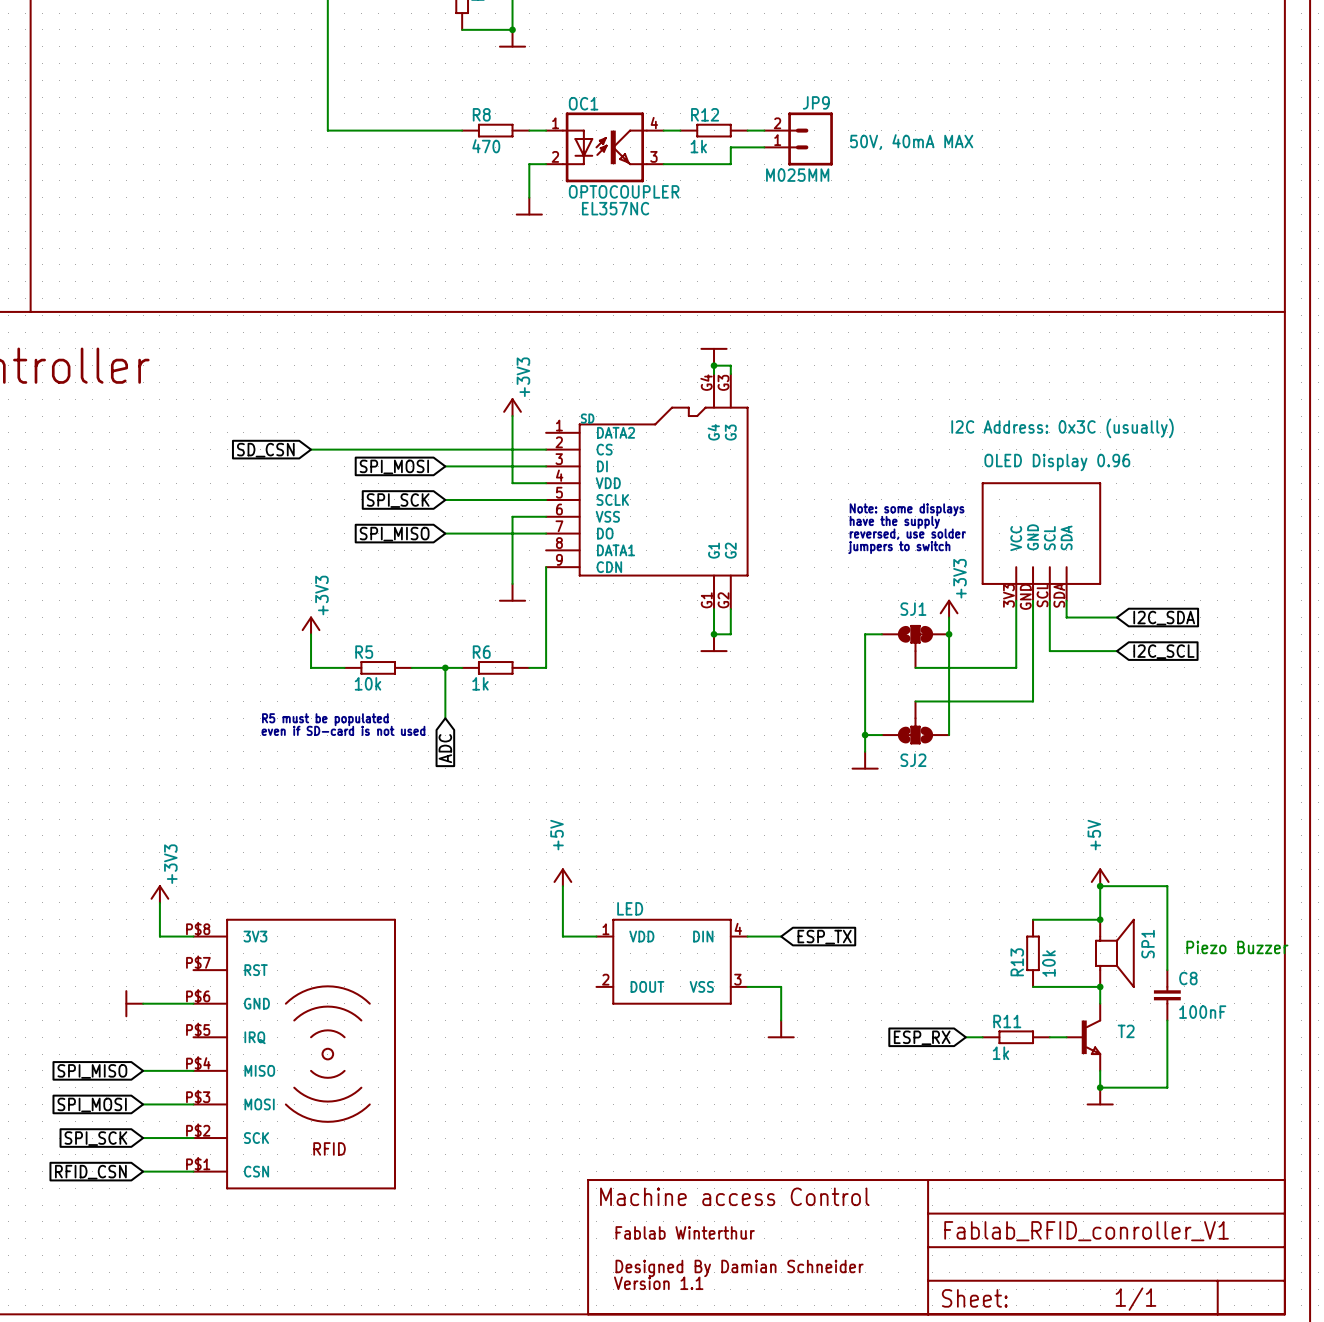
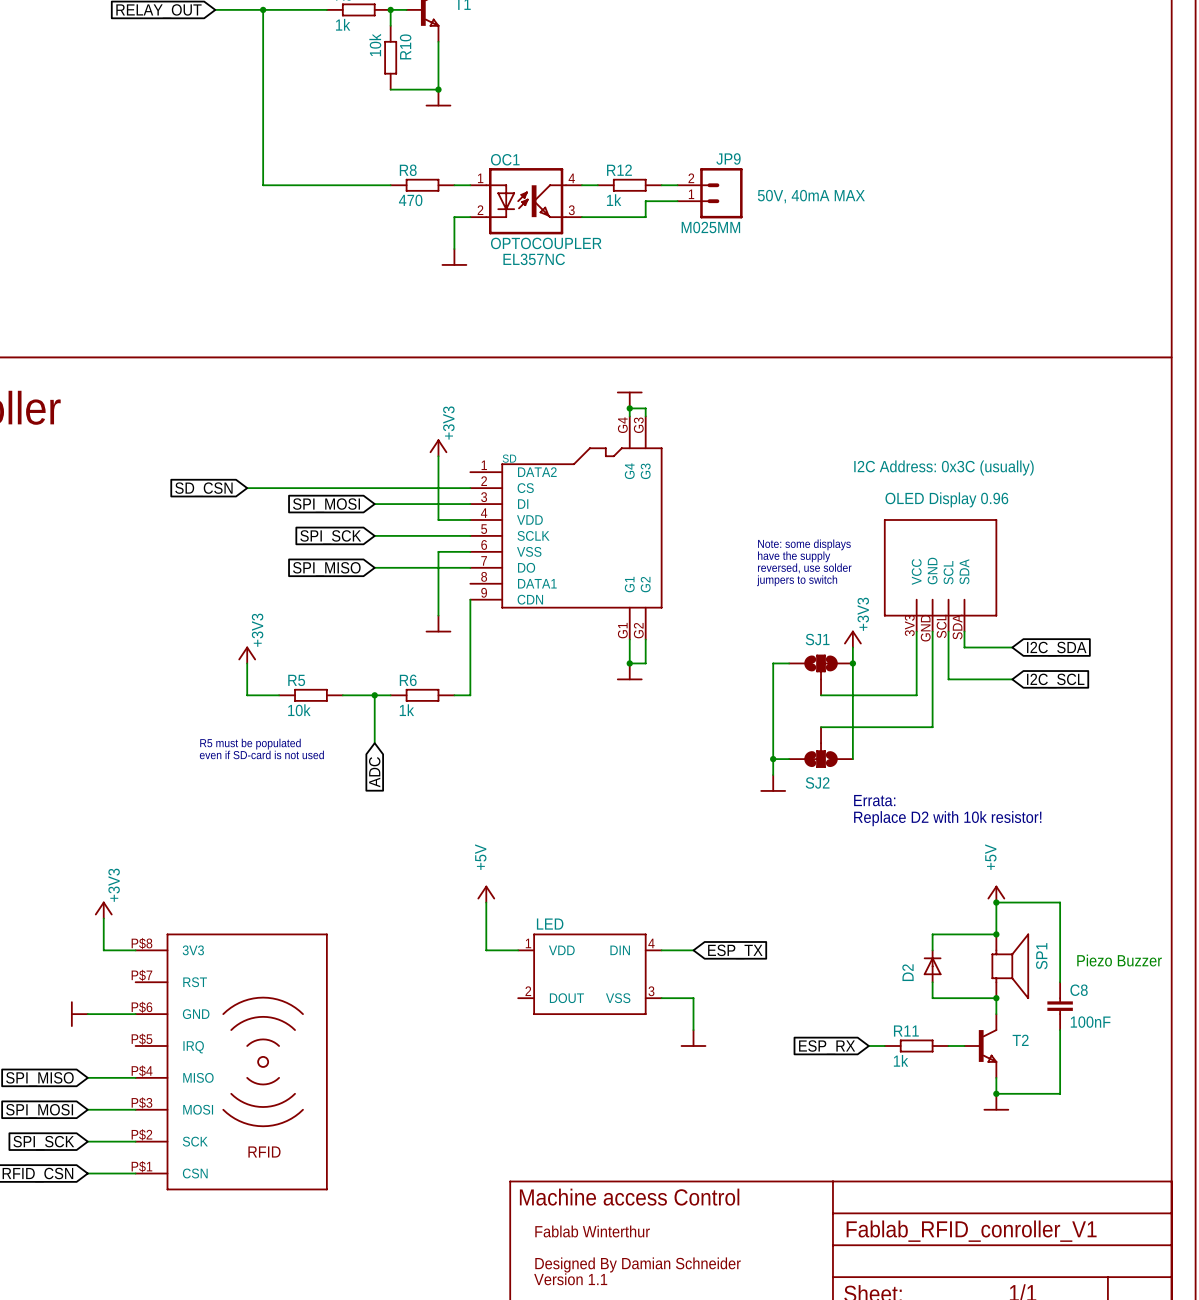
text: none -> Errata: (874, 800)
text: none -> Replace D2 with 10k resistor! (947, 818)
R13: 10k (1033, 953) -> none
D2: none -> (932, 966)

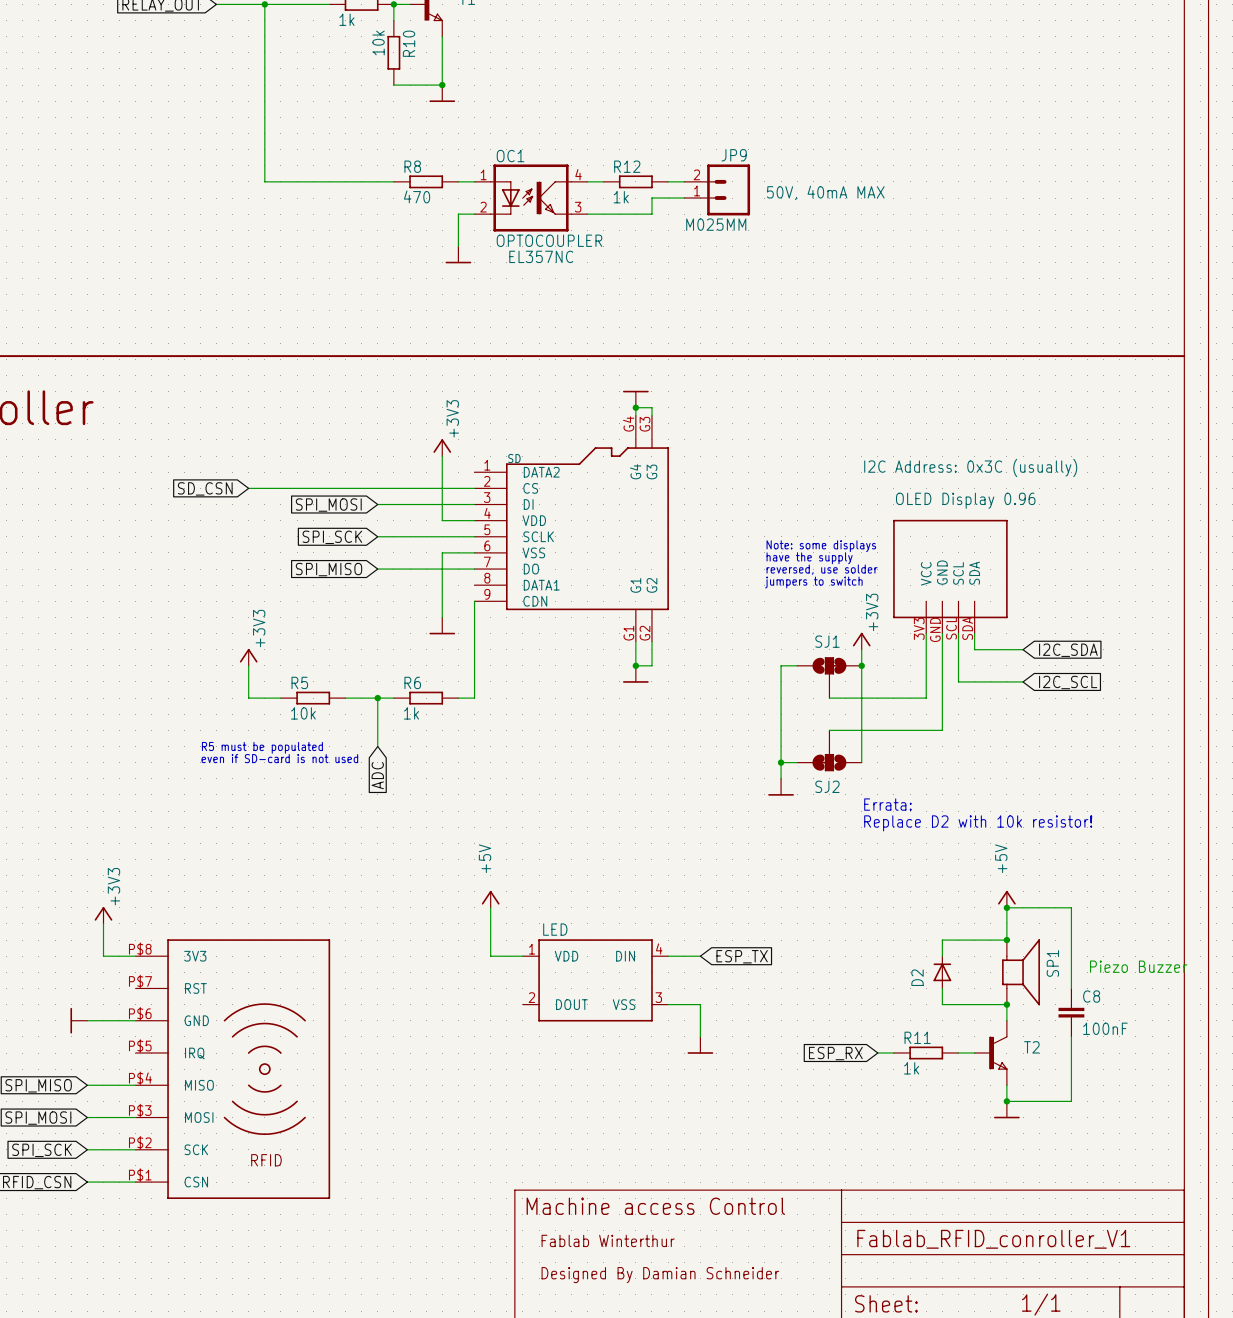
text: Version 1.1 (570, 1279) -> none

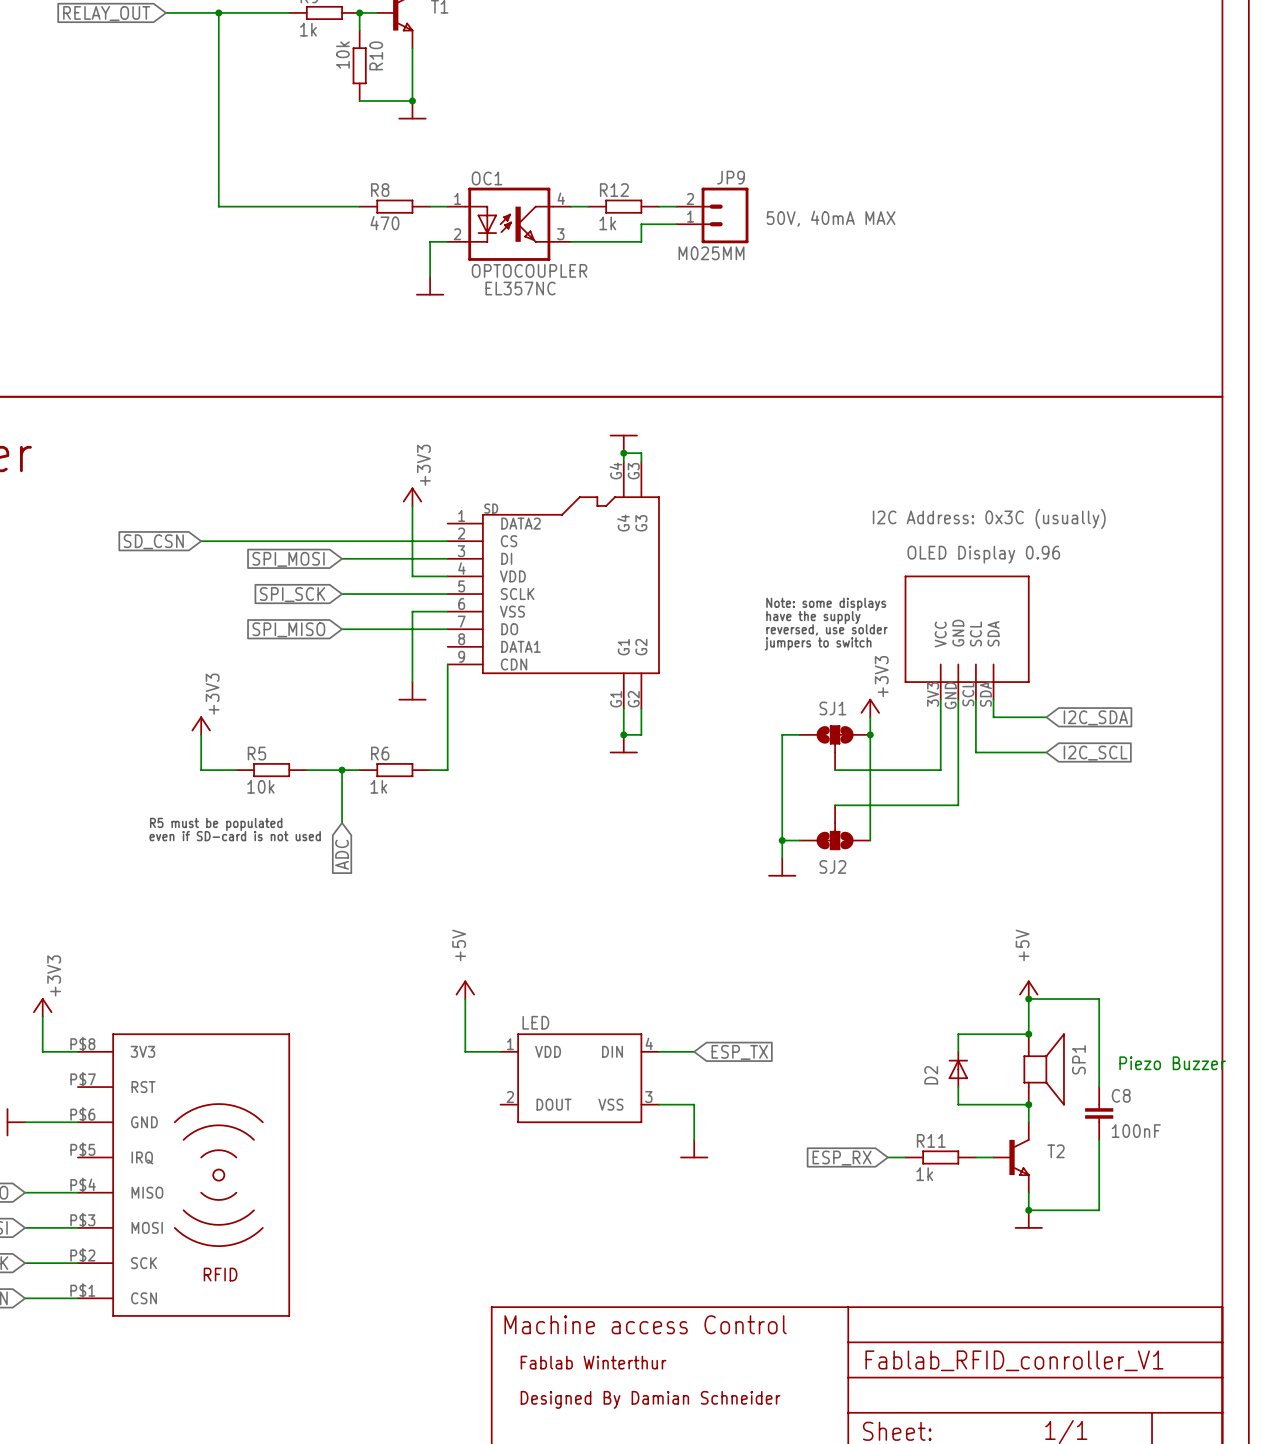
text: Errata: (887, 804) -> none
text: Replace D2 with 10k resistor! (978, 823) -> none

